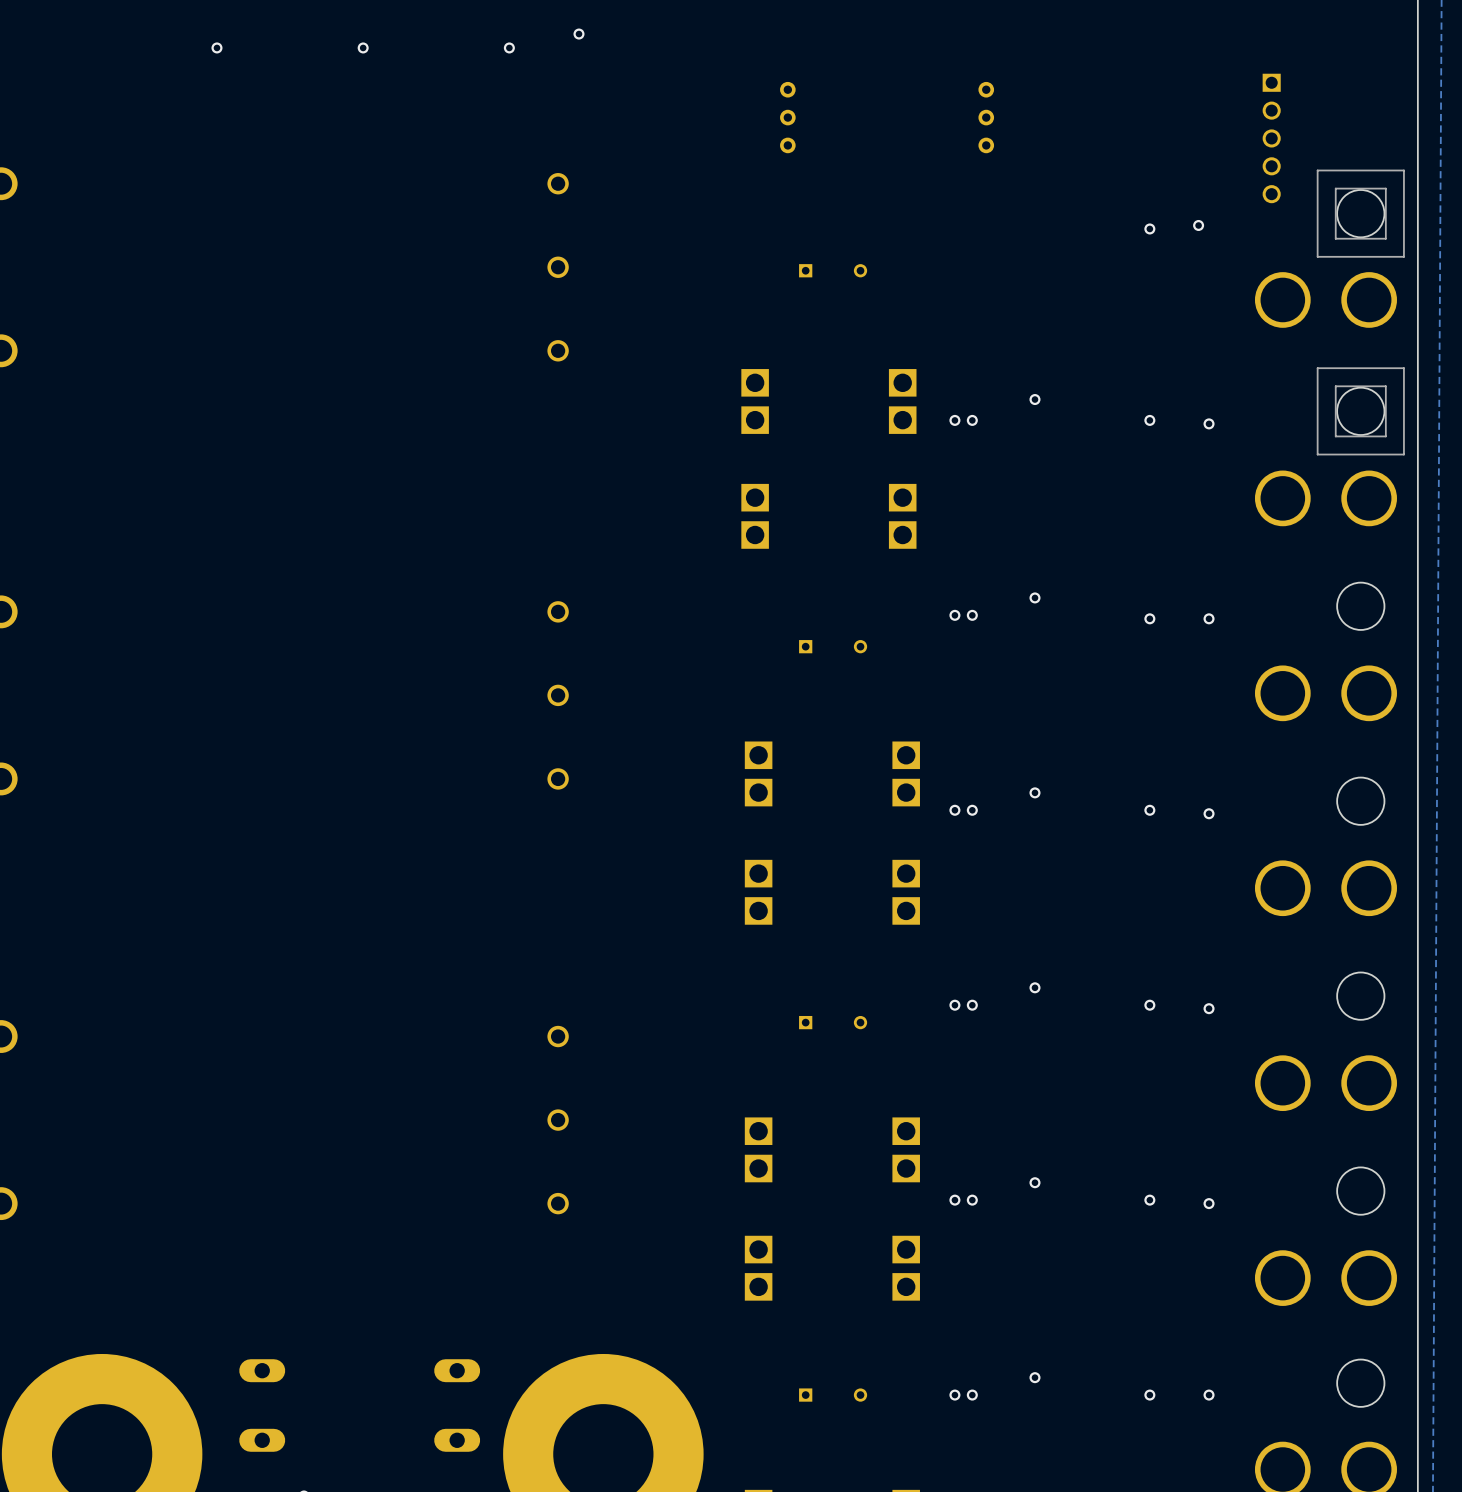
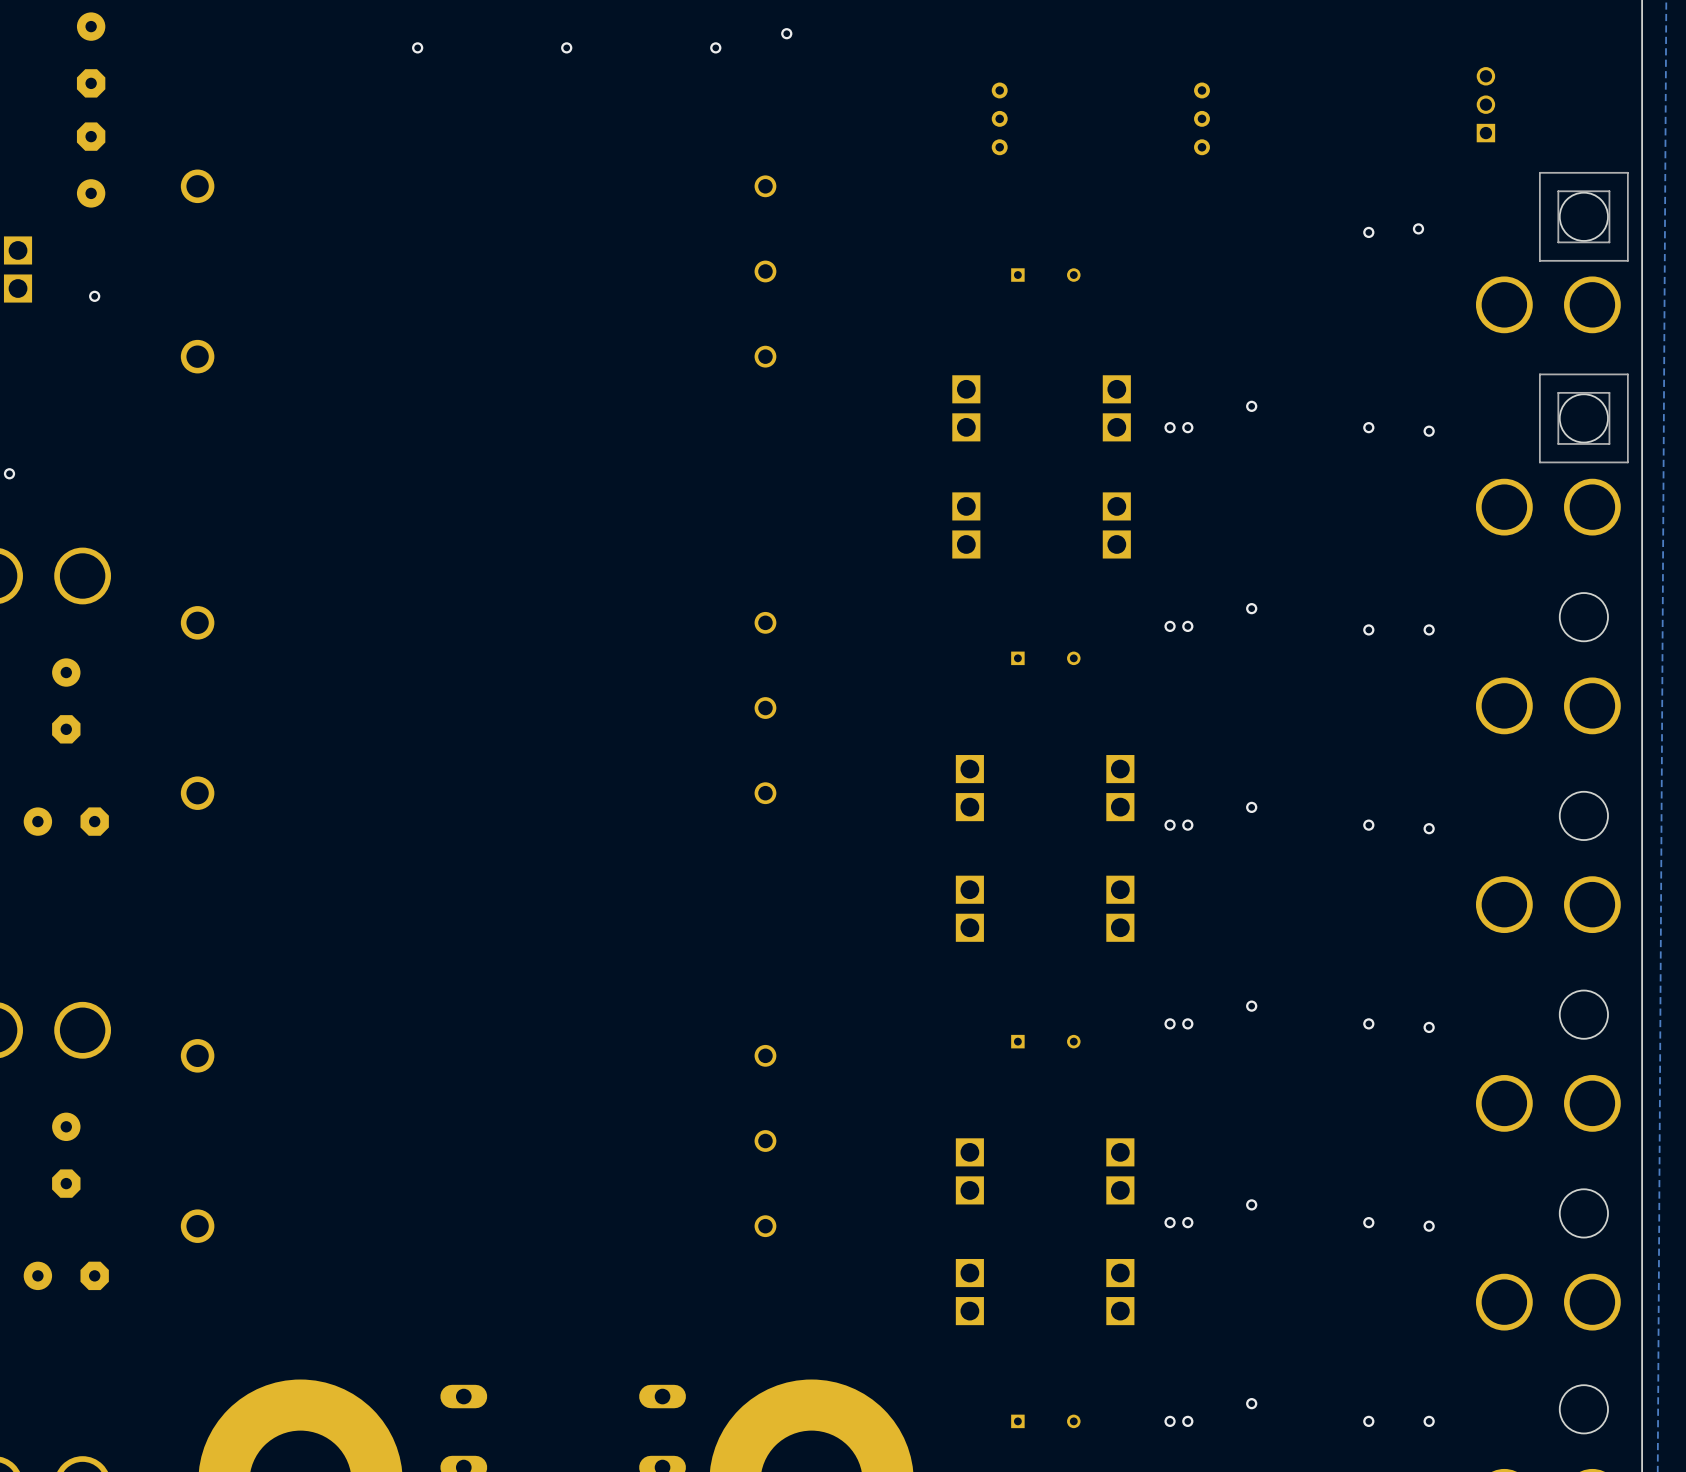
part: none -> (1485, 104)
part: (1271, 138) -> none

